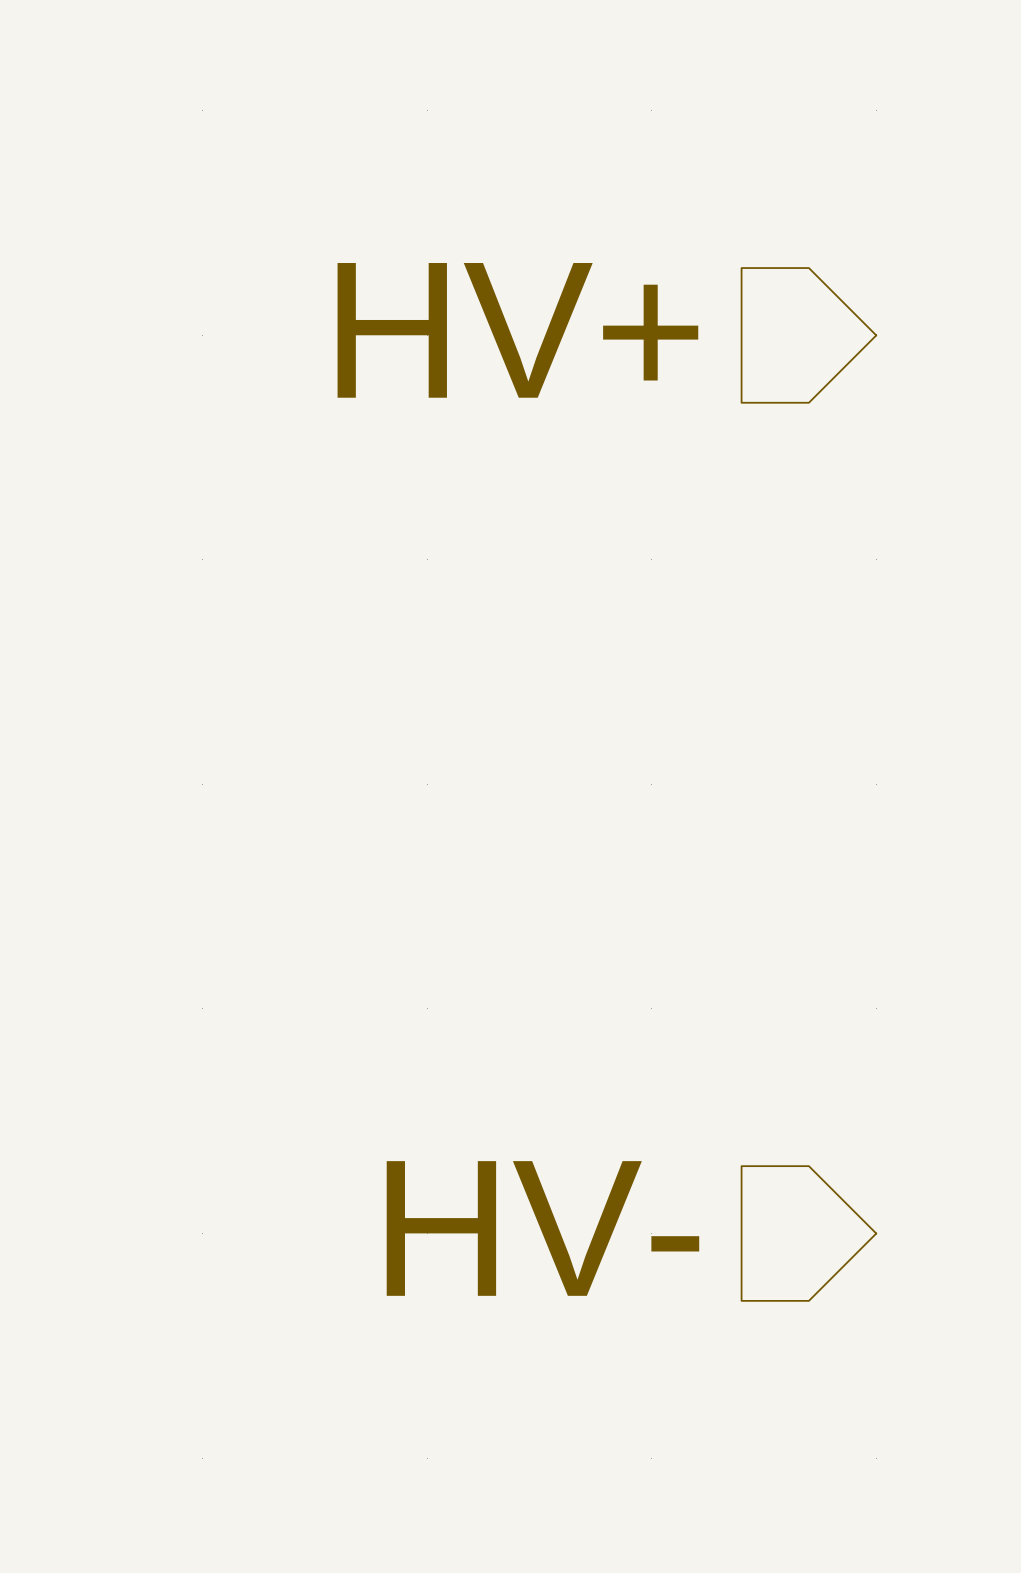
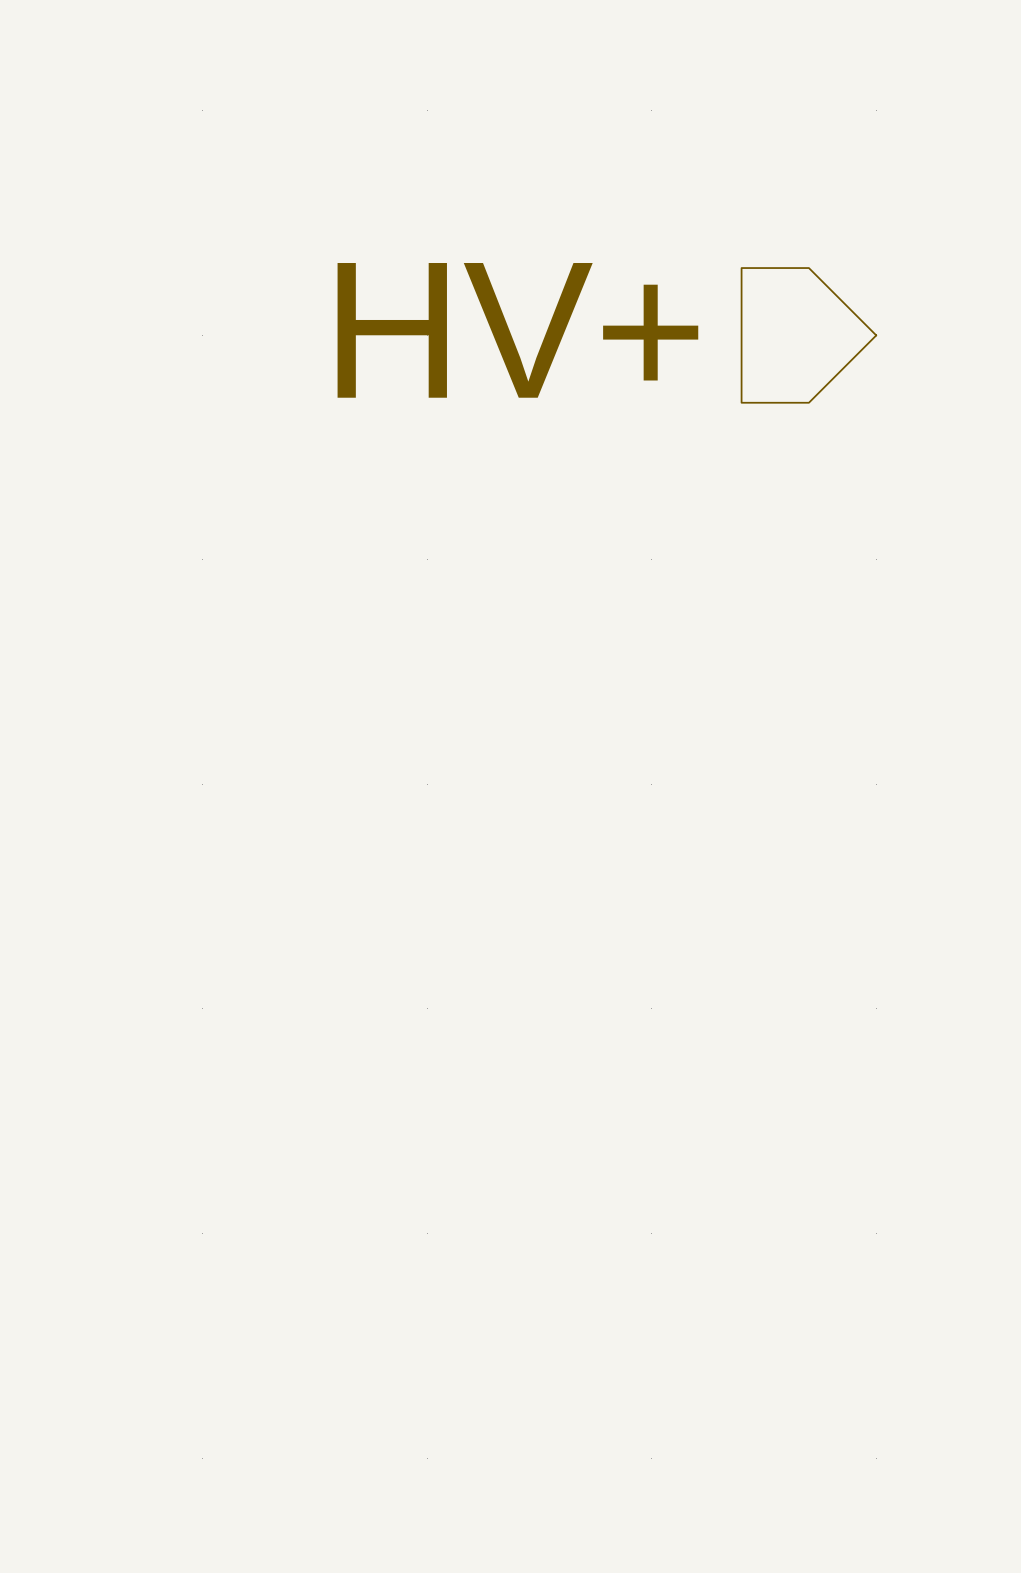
hierarchical label: HV- (542, 1228) -> none

